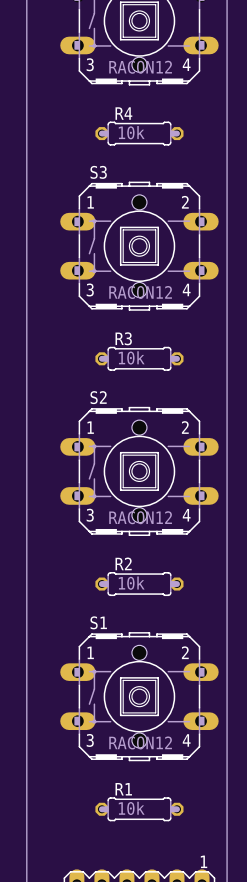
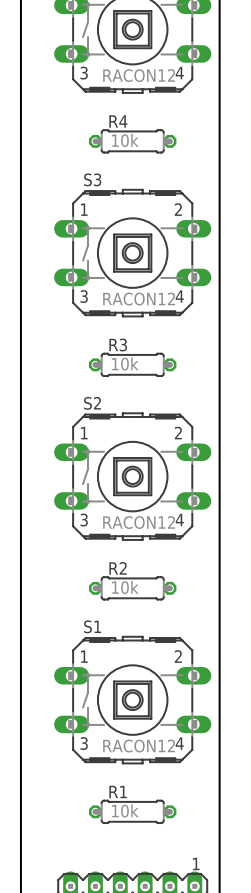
hole: (139, 64) -> none
hole: (139, 202) -> none
hole: (139, 289) -> none
hole: (139, 427) -> none
hole: (139, 515) -> none
hole: (139, 652) -> none
hole: (139, 740) -> none

